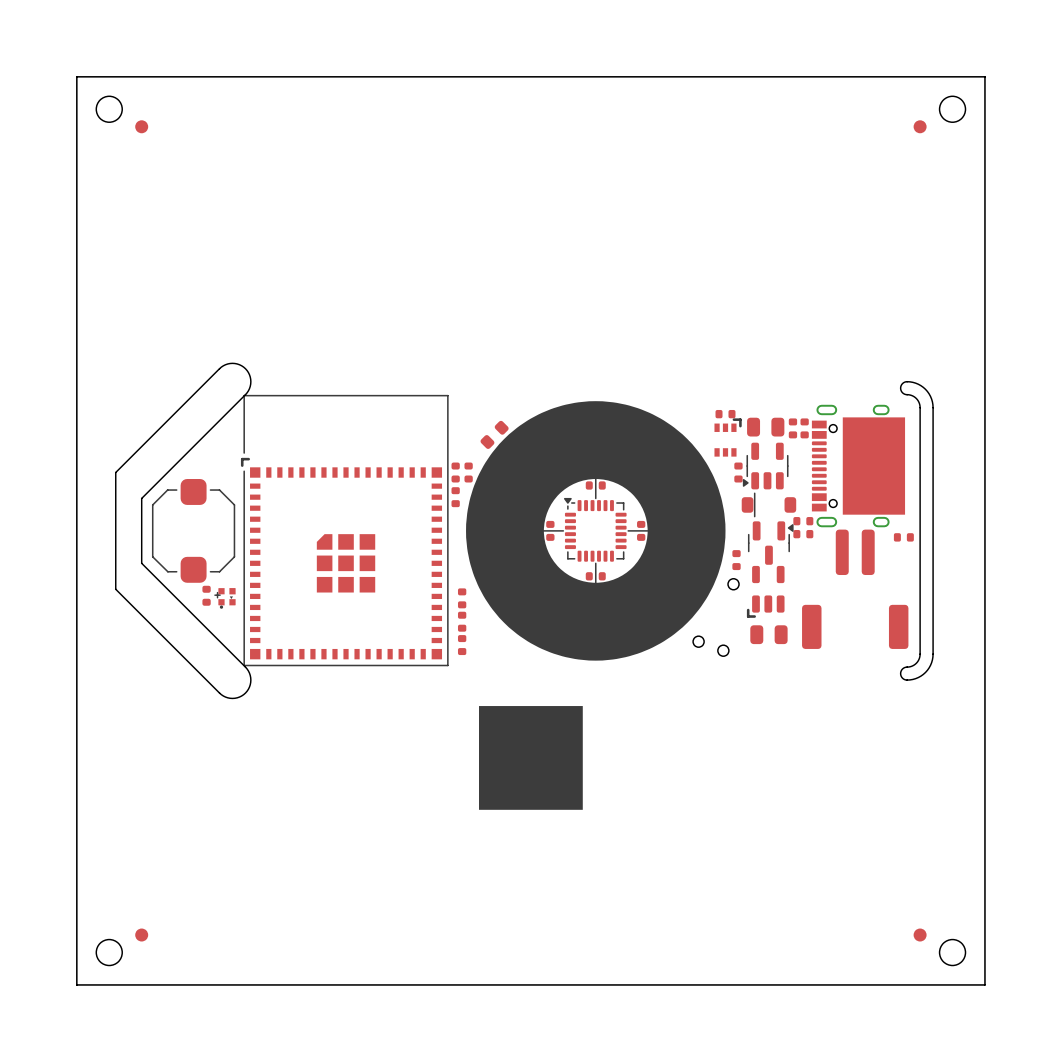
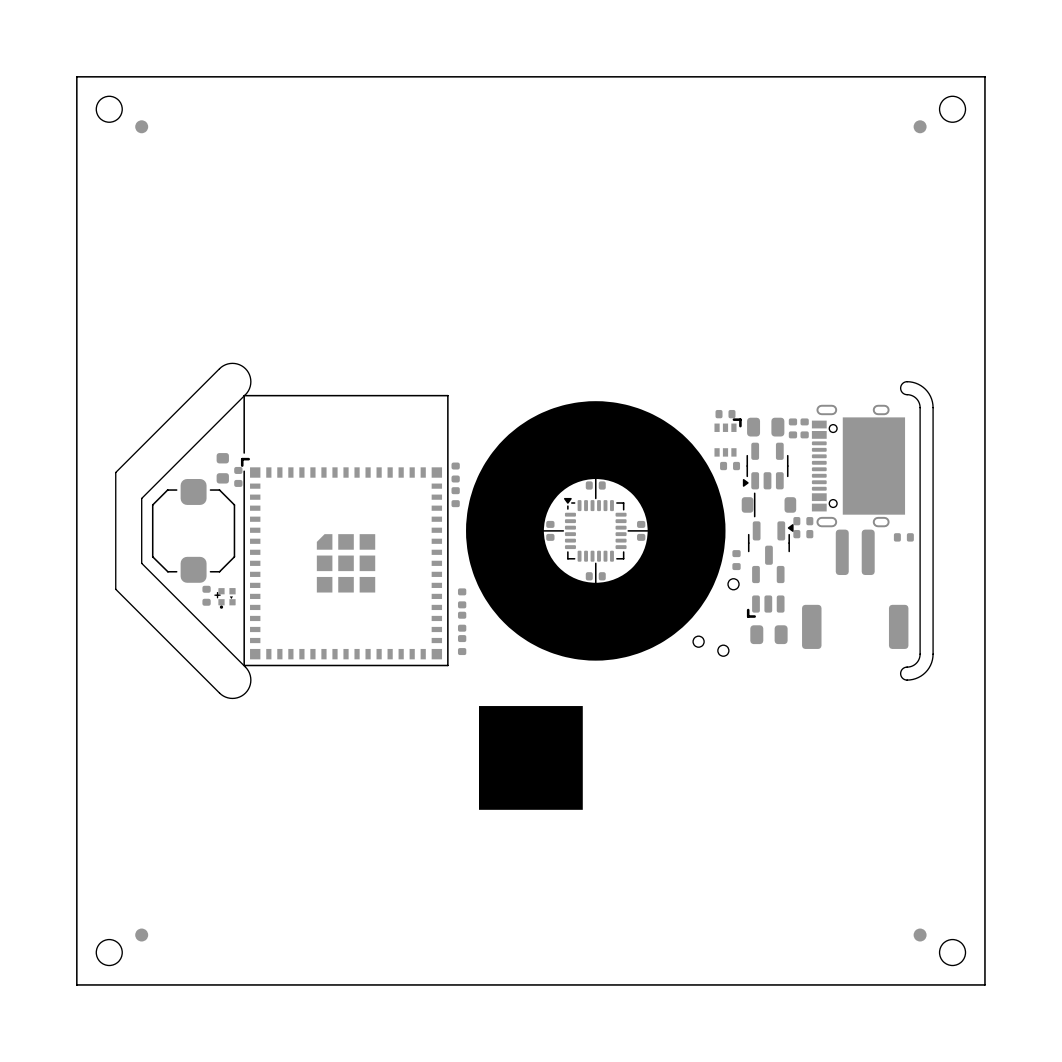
part: (494, 434) -> none
part: none -> (222, 468)
part position: (468, 472) -> (238, 476)
part rotation: 0° (738, 472) -> 90° clockwise (730, 466)

